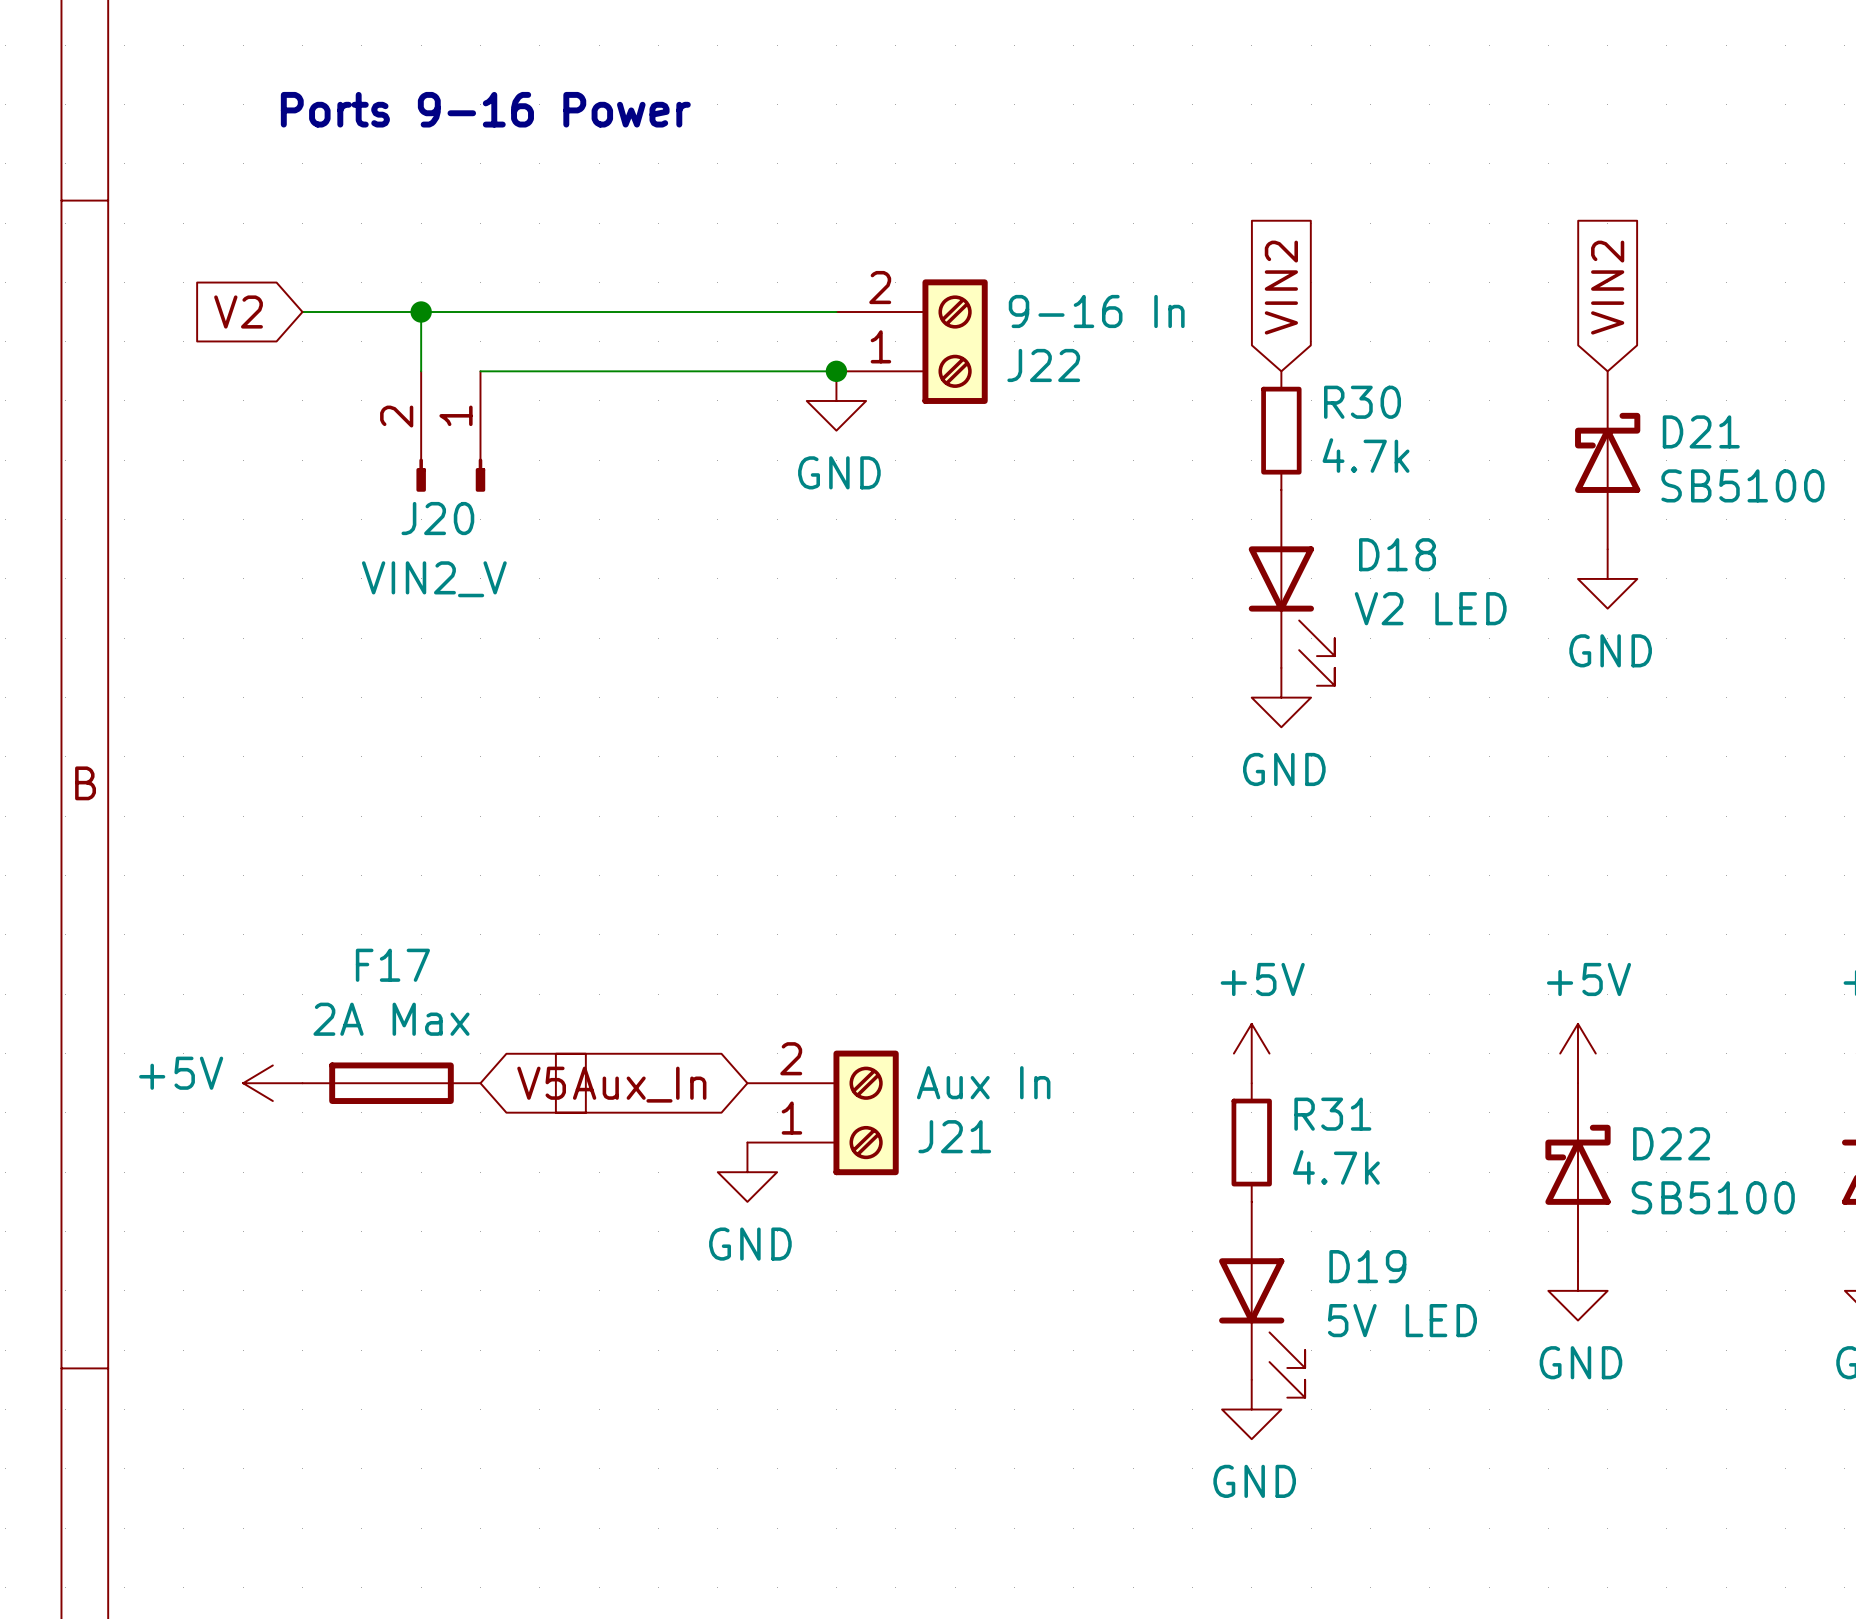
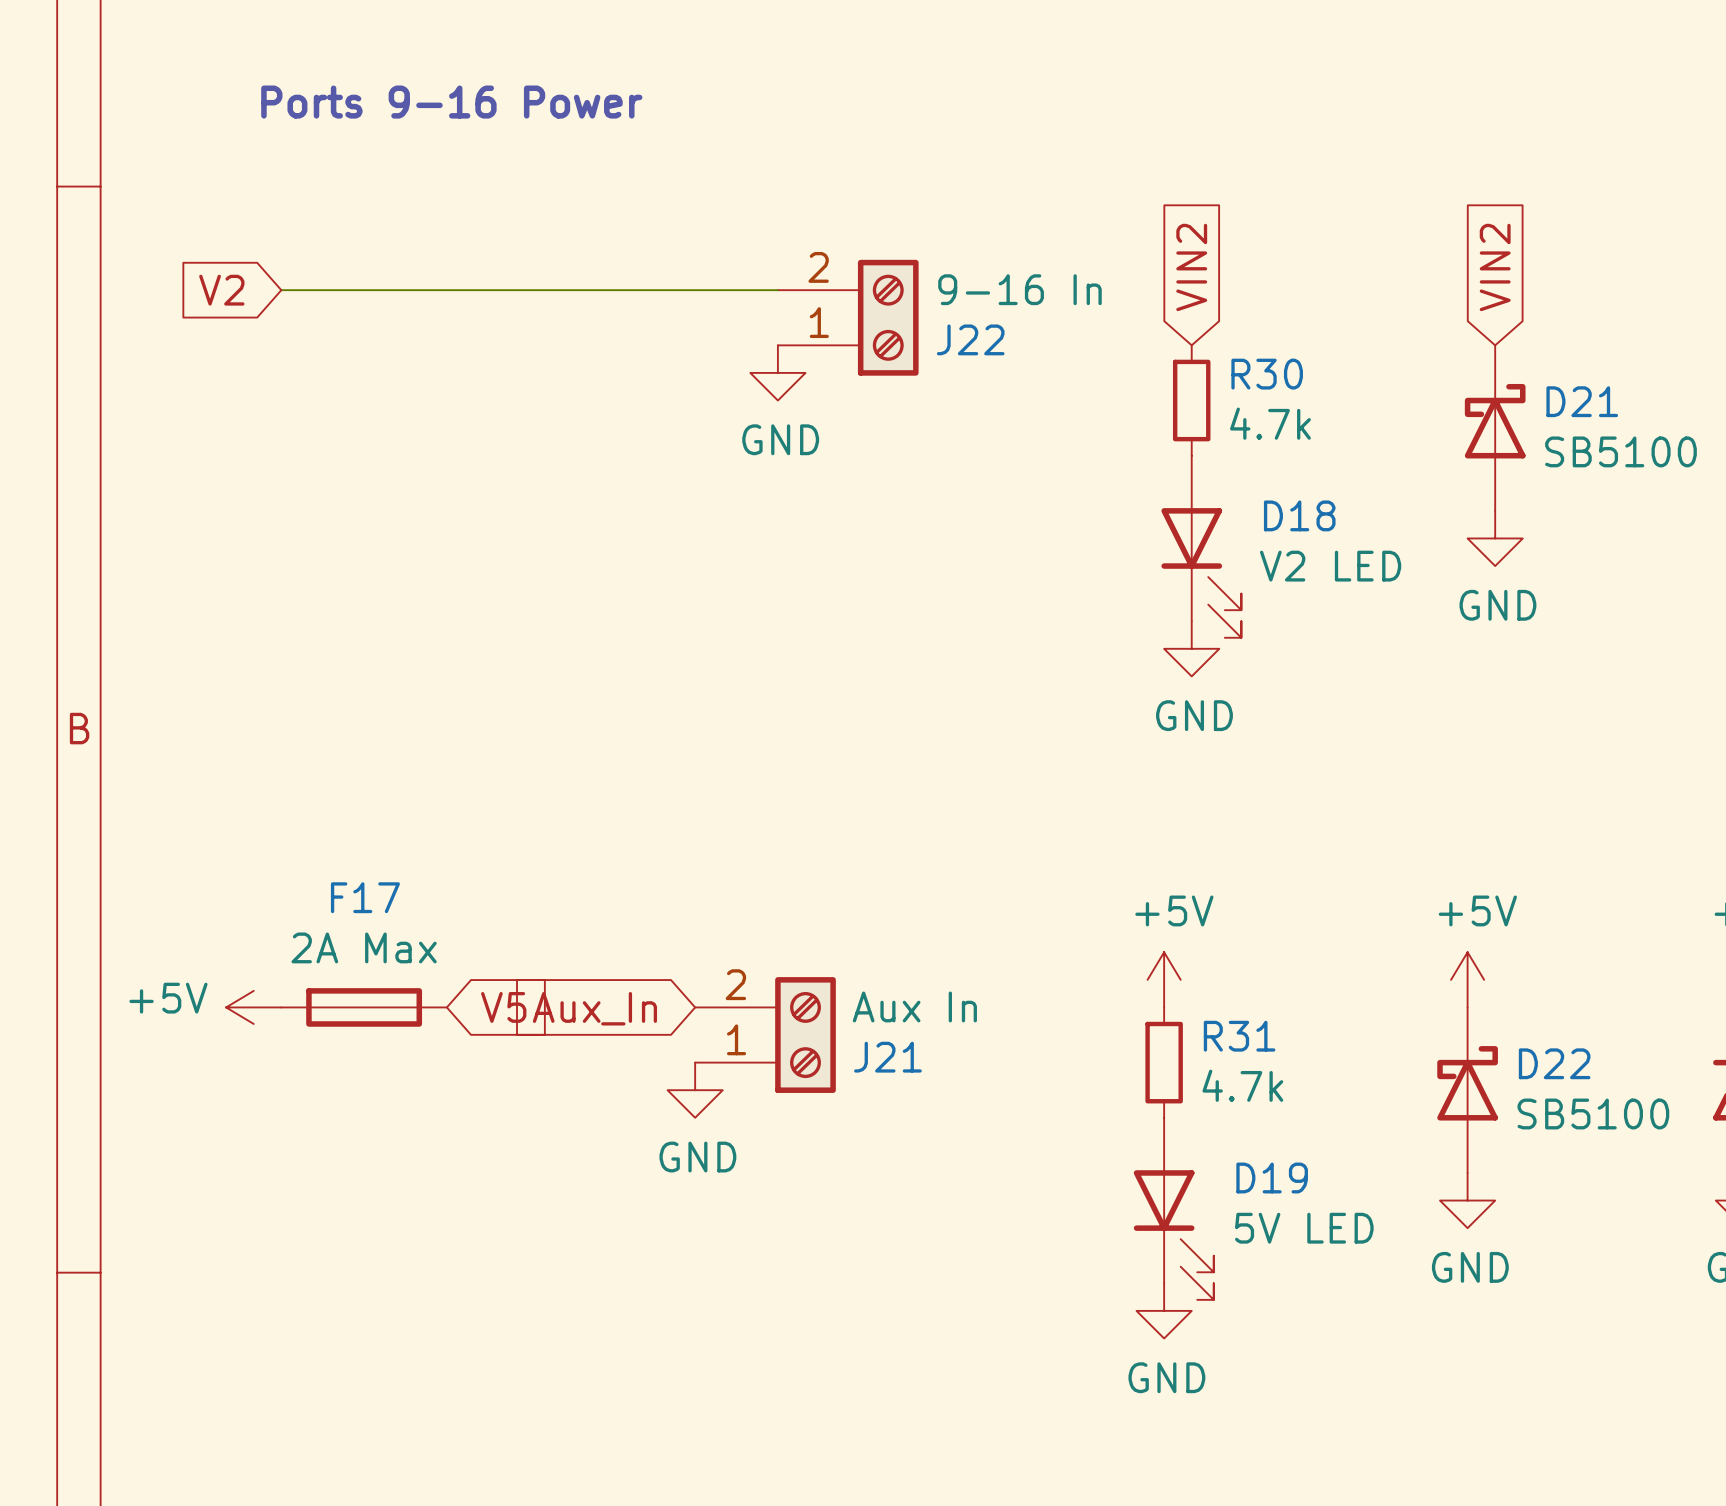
wire: (421, 312) (421, 371) -> none
junction: (421, 312) -> none
wire: (480, 371) (836, 371) -> none
junction: (836, 371) -> none
J20: VIN2_V (450, 431) -> none

